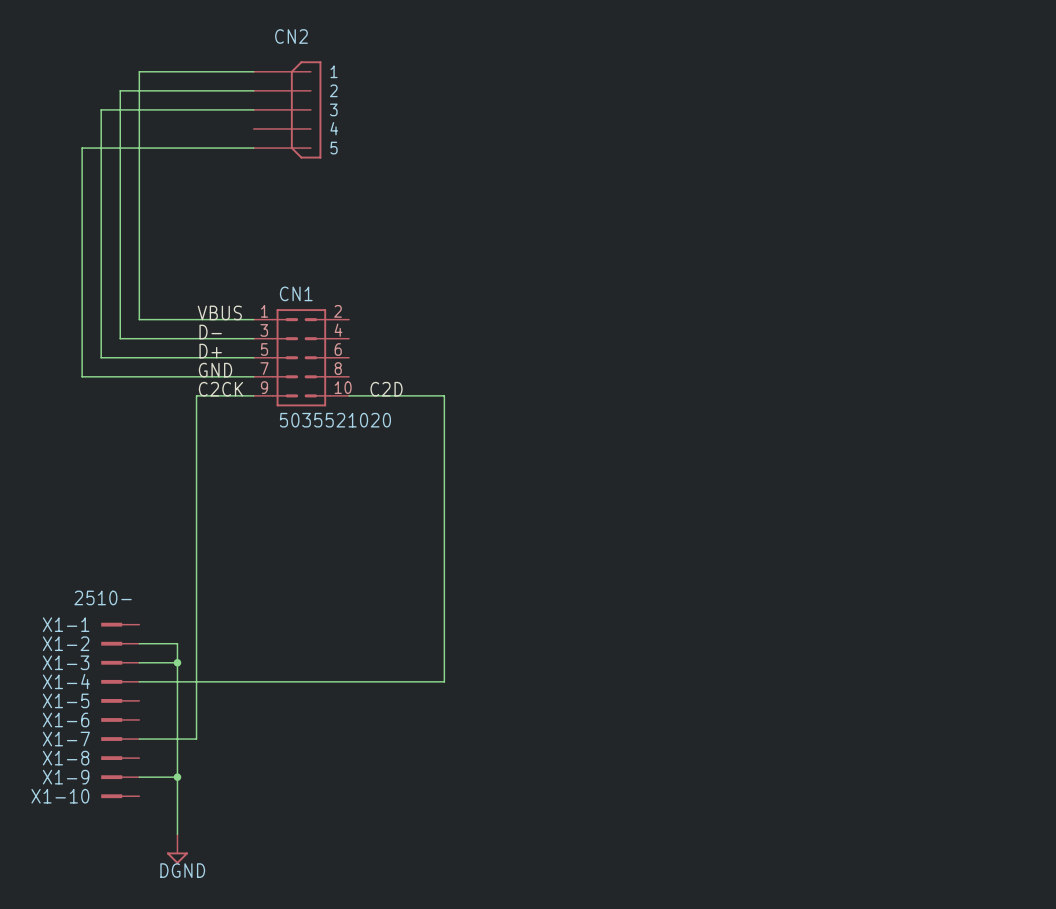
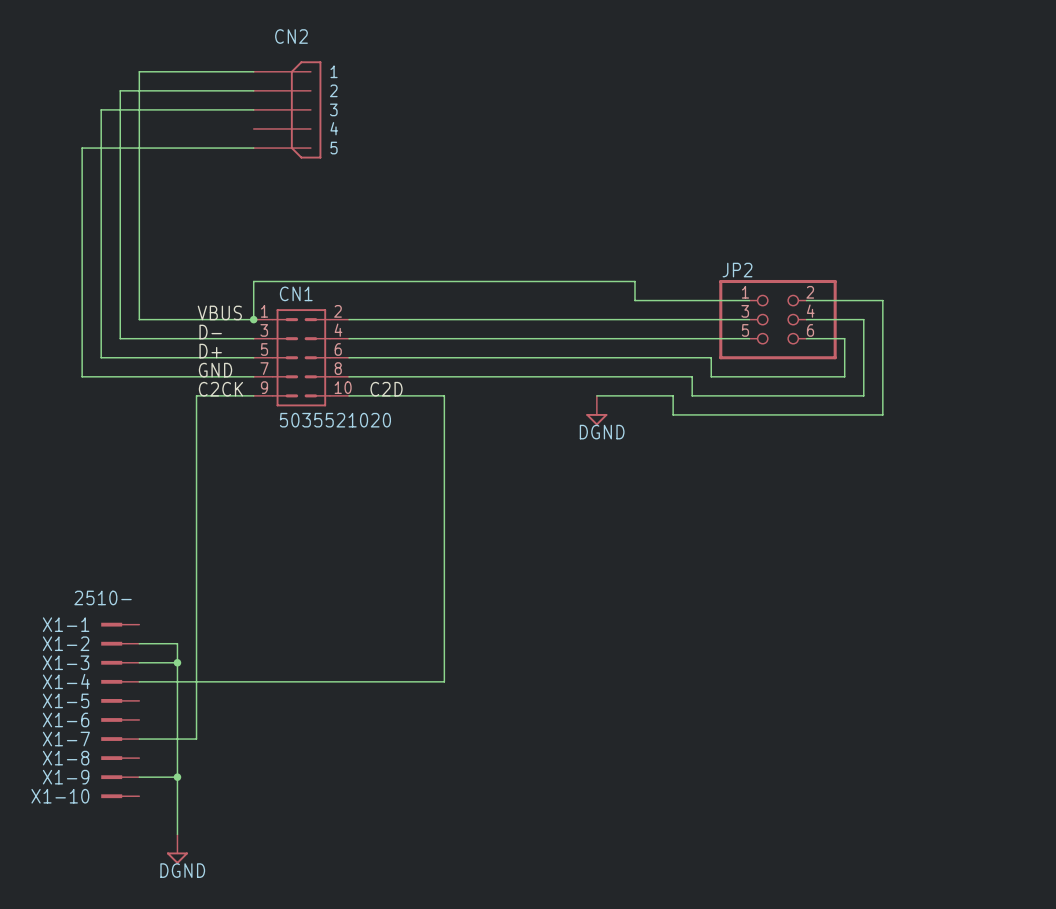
wire: none -> (749, 300) (635, 300) (635, 281) (253, 281) (253, 319)
wire: none -> (806, 300) (882, 300) (882, 414) (673, 414) (673, 395) (596, 395)
junction: none -> (253, 319)
wire: none -> (349, 319) (749, 319)
JP2: none -> (777, 319)
wire: none -> (806, 319) (863, 319) (863, 395) (692, 395) (692, 376) (349, 376)
wire: none -> (349, 338) (749, 338)
wire: none -> (806, 338) (844, 338) (844, 376) (711, 376) (711, 357) (349, 357)
power symbol: none -> DGND (596, 410)

